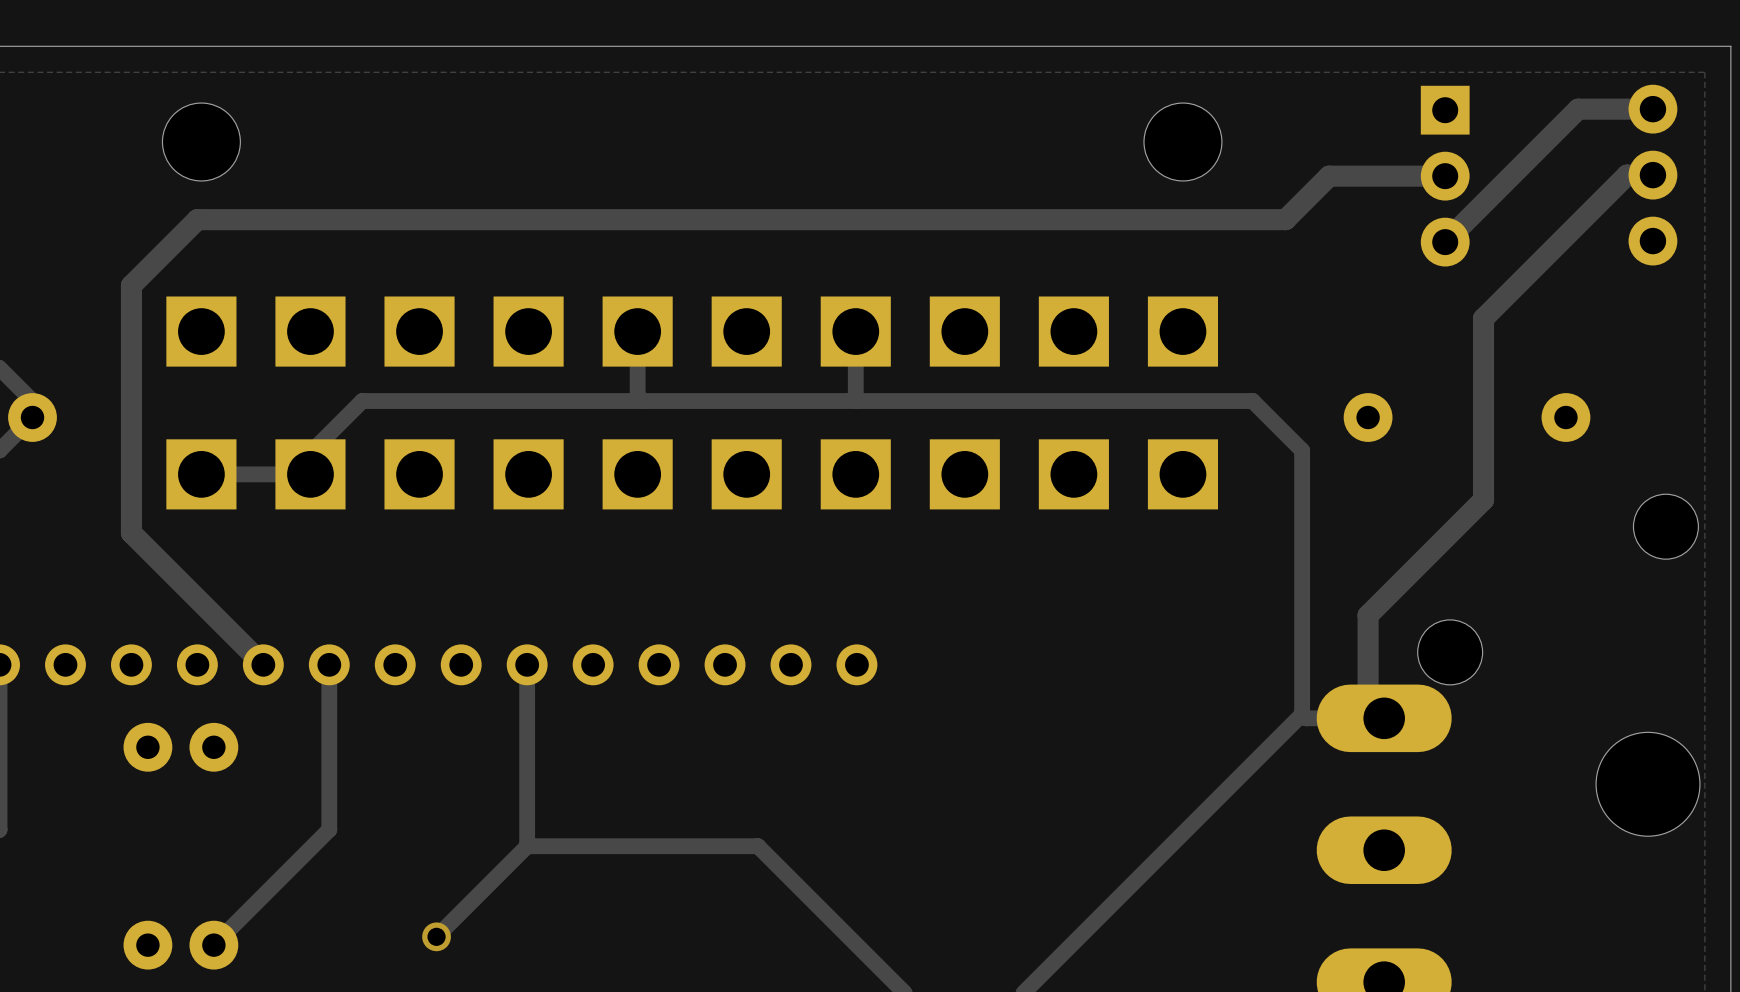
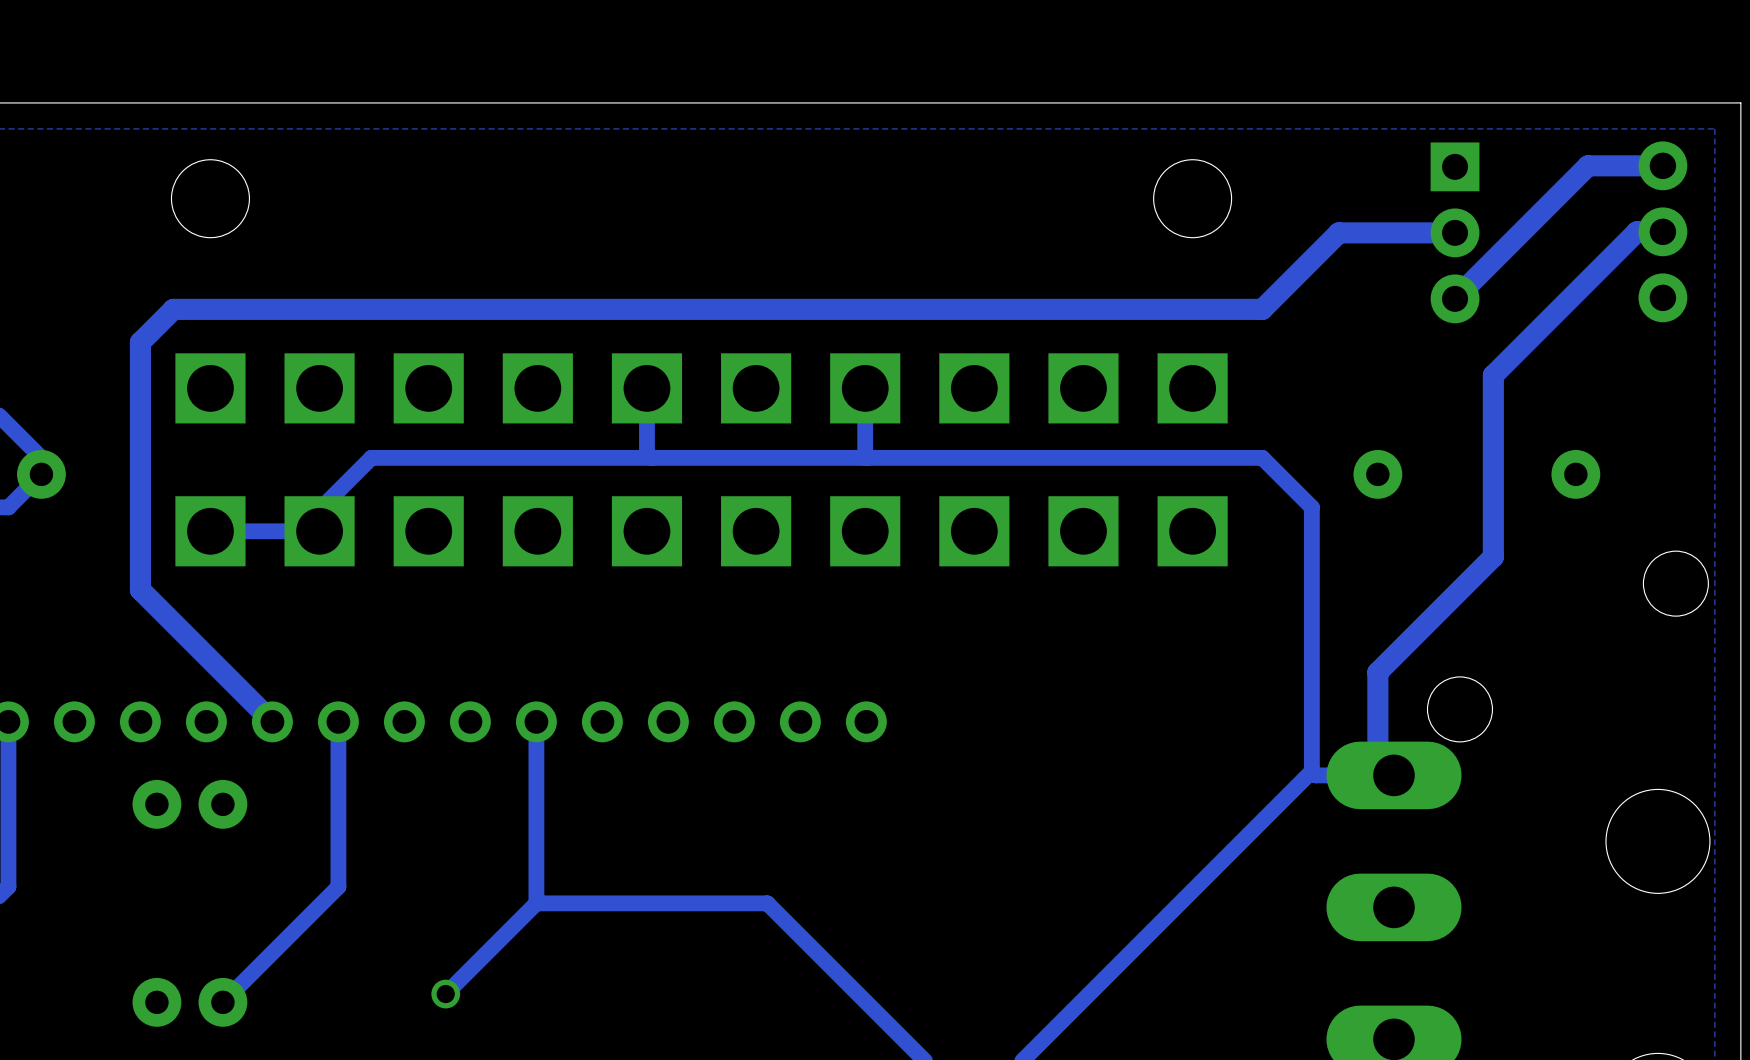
track: (1285, 219) (197, 219) (164, 252) -> (1295, 276) (1262, 309) (173, 309)

